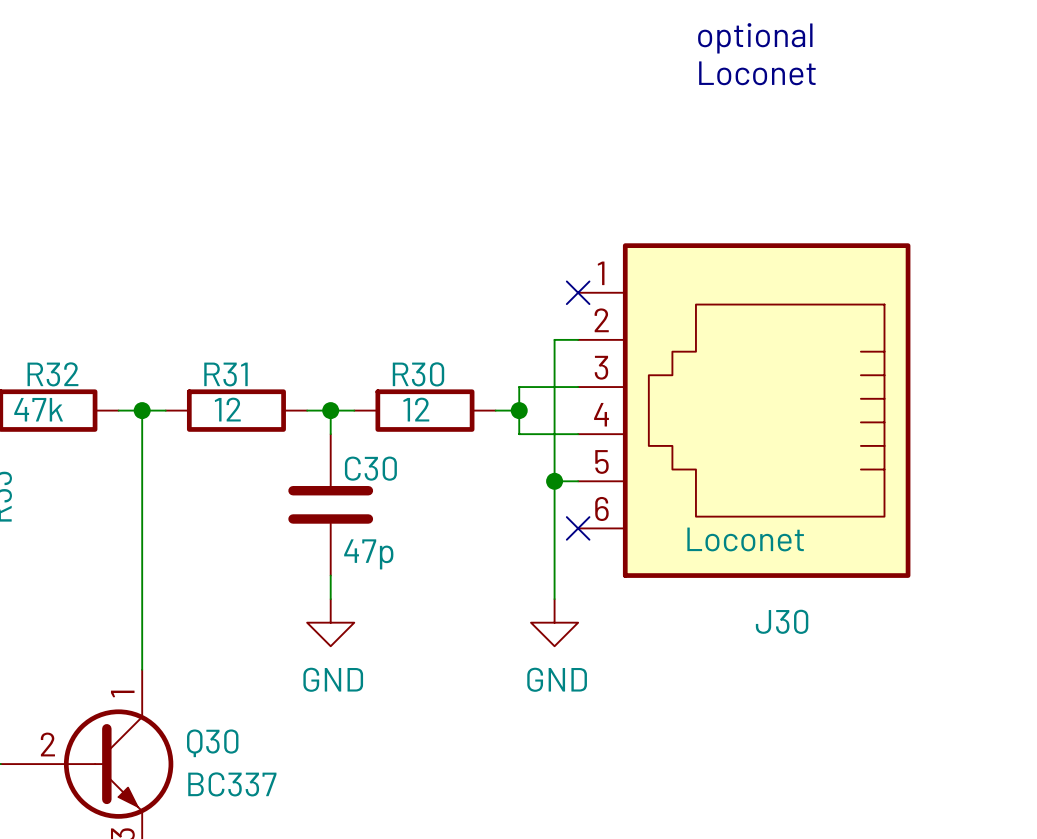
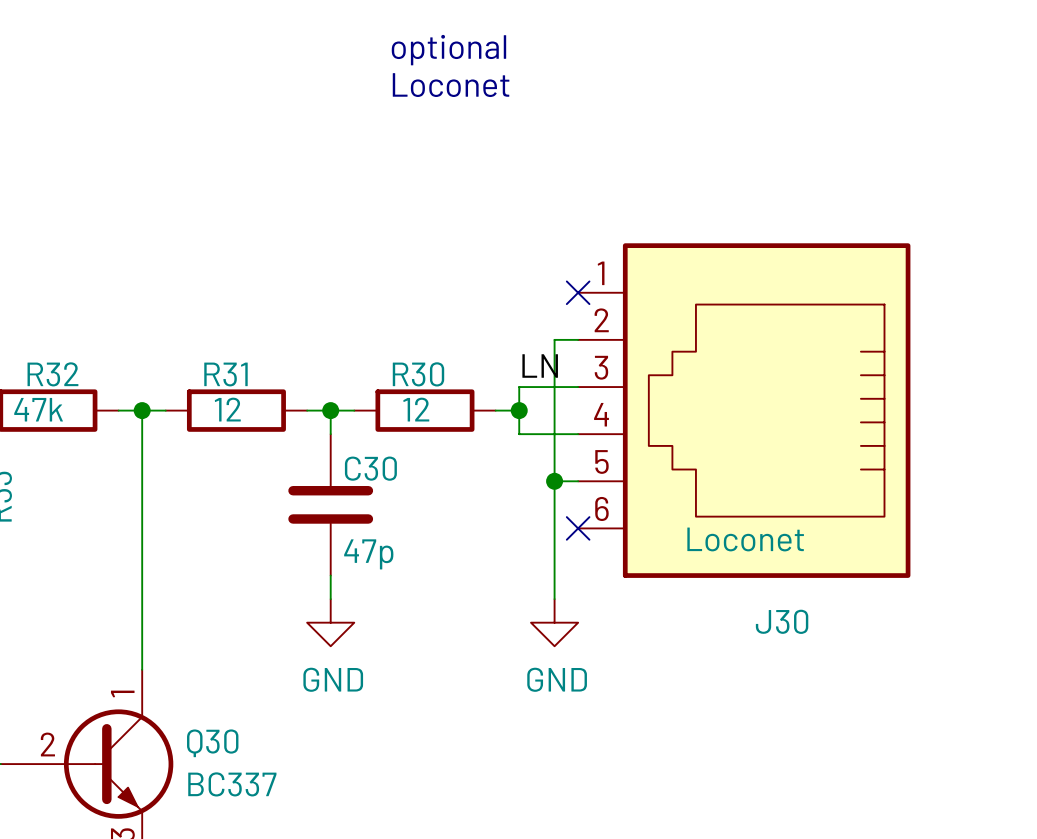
text position: optional (755, 38) -> optional (448, 50)
text position: Loconet (757, 73) -> Loconet (451, 85)
label: none -> LN (540, 366)

